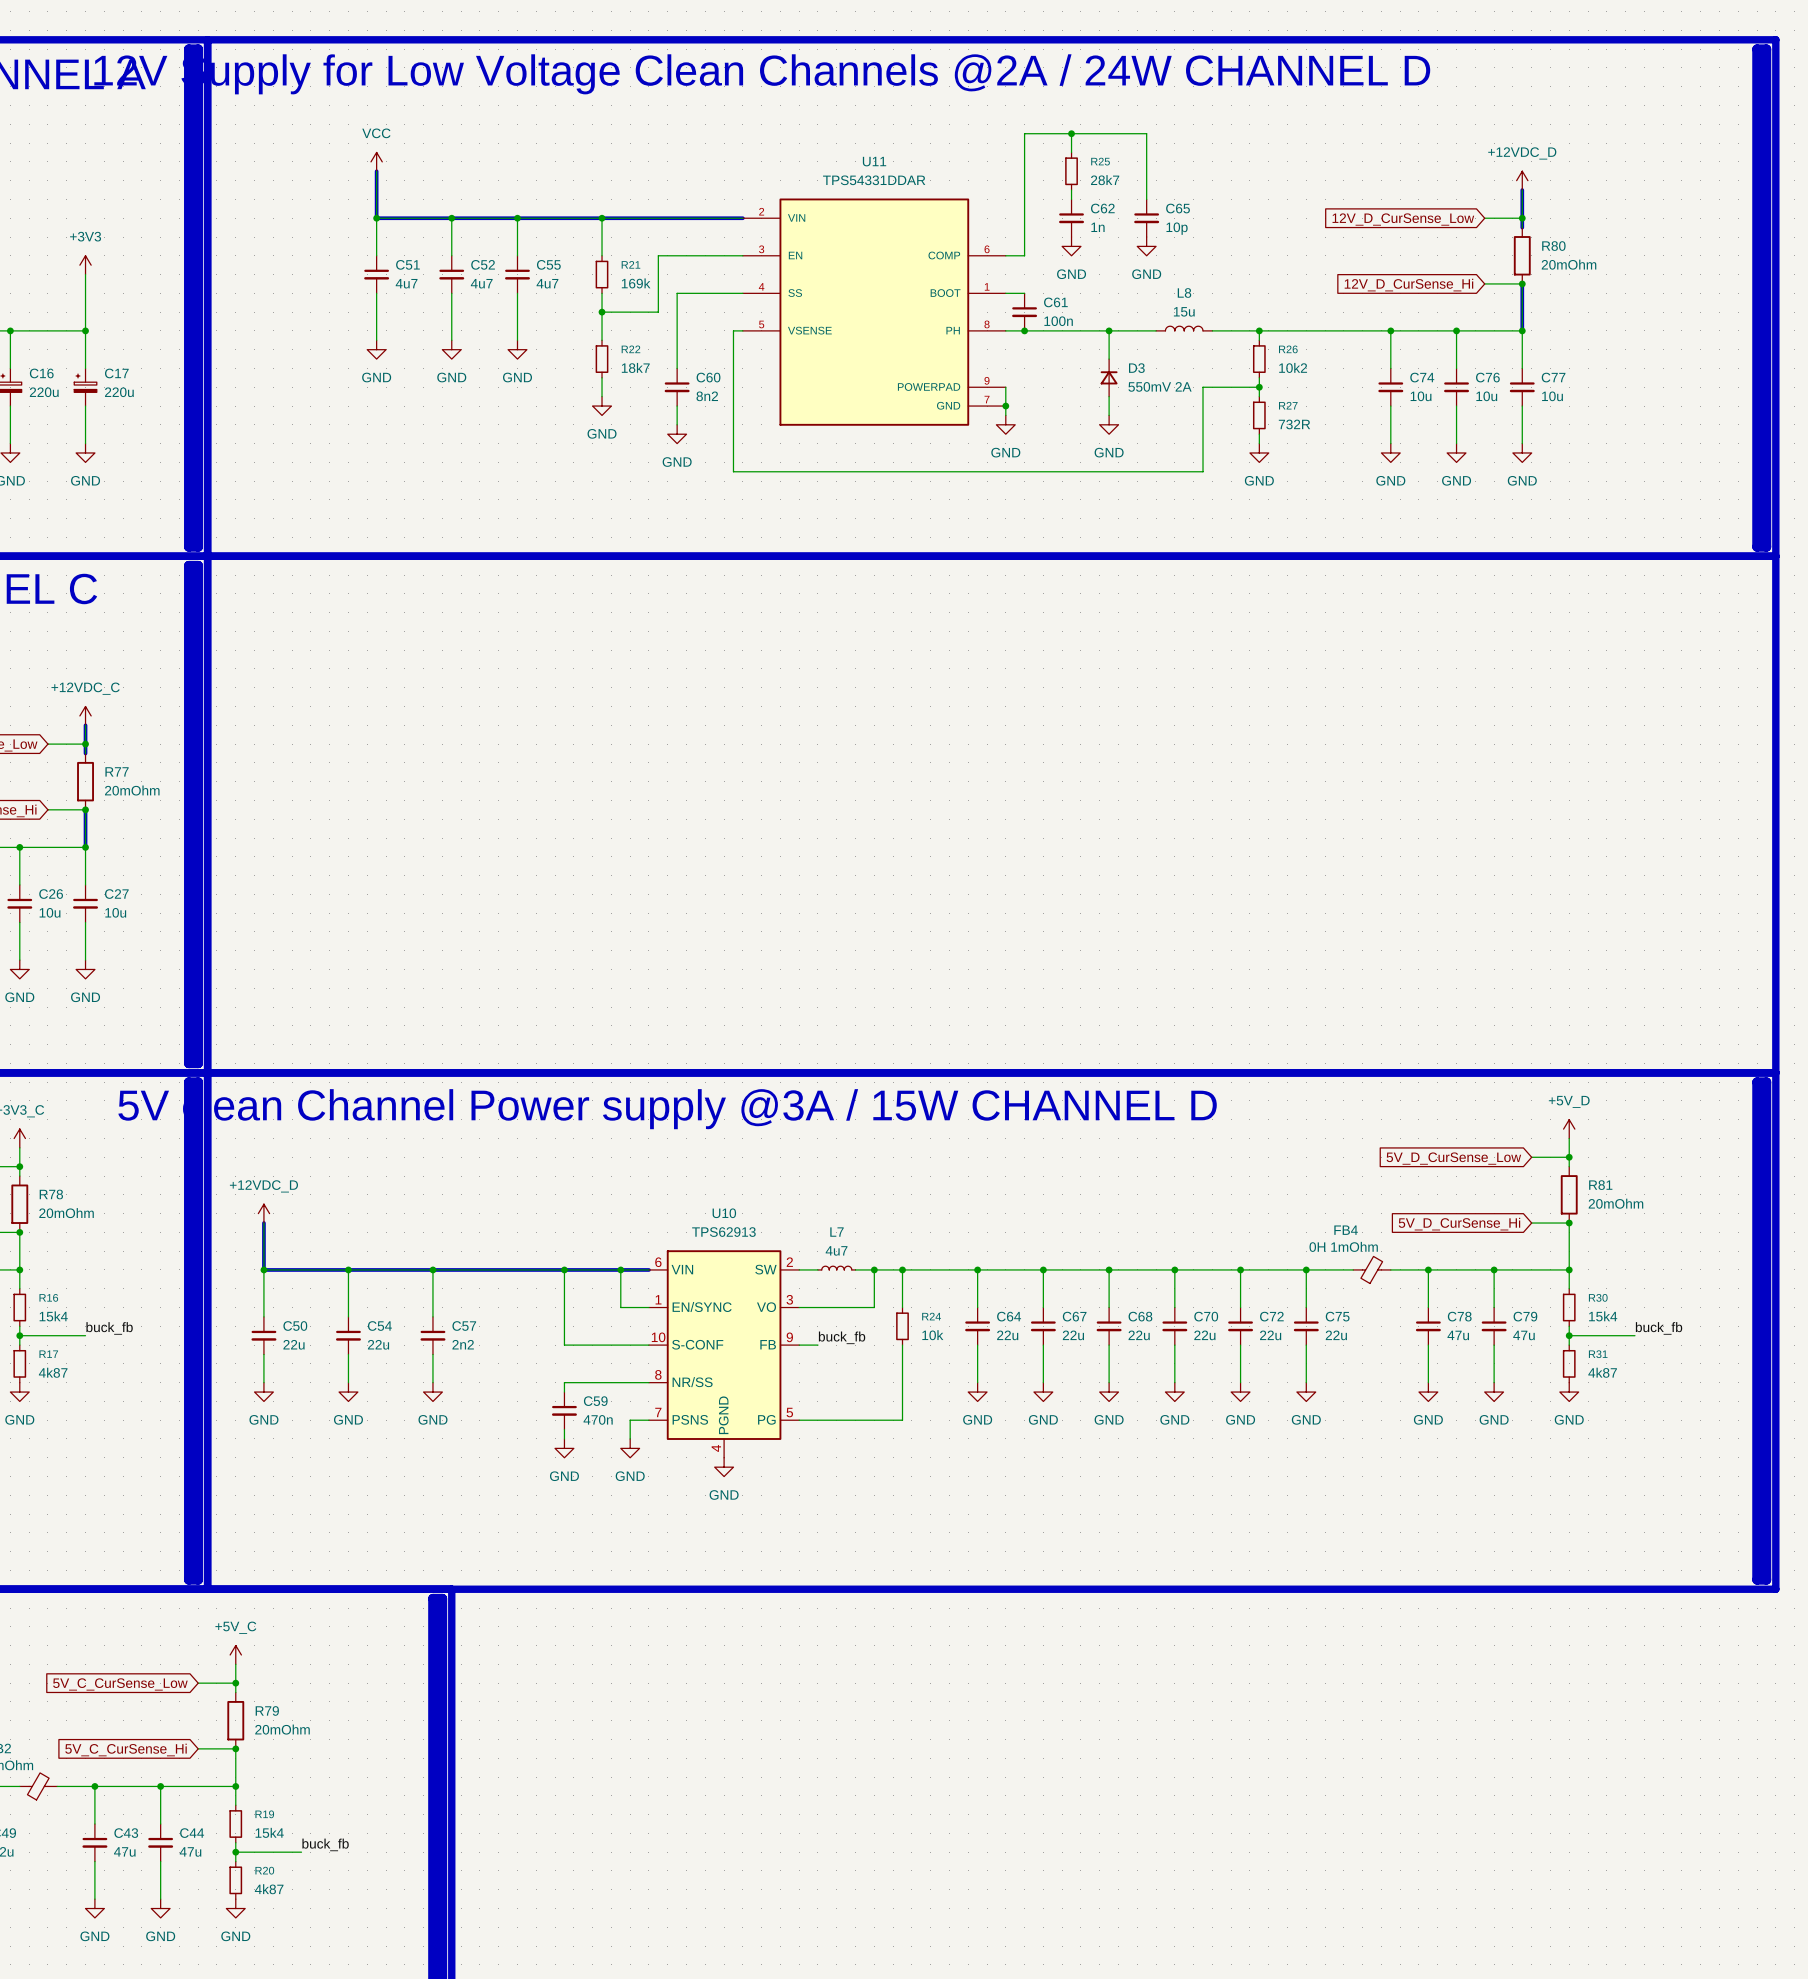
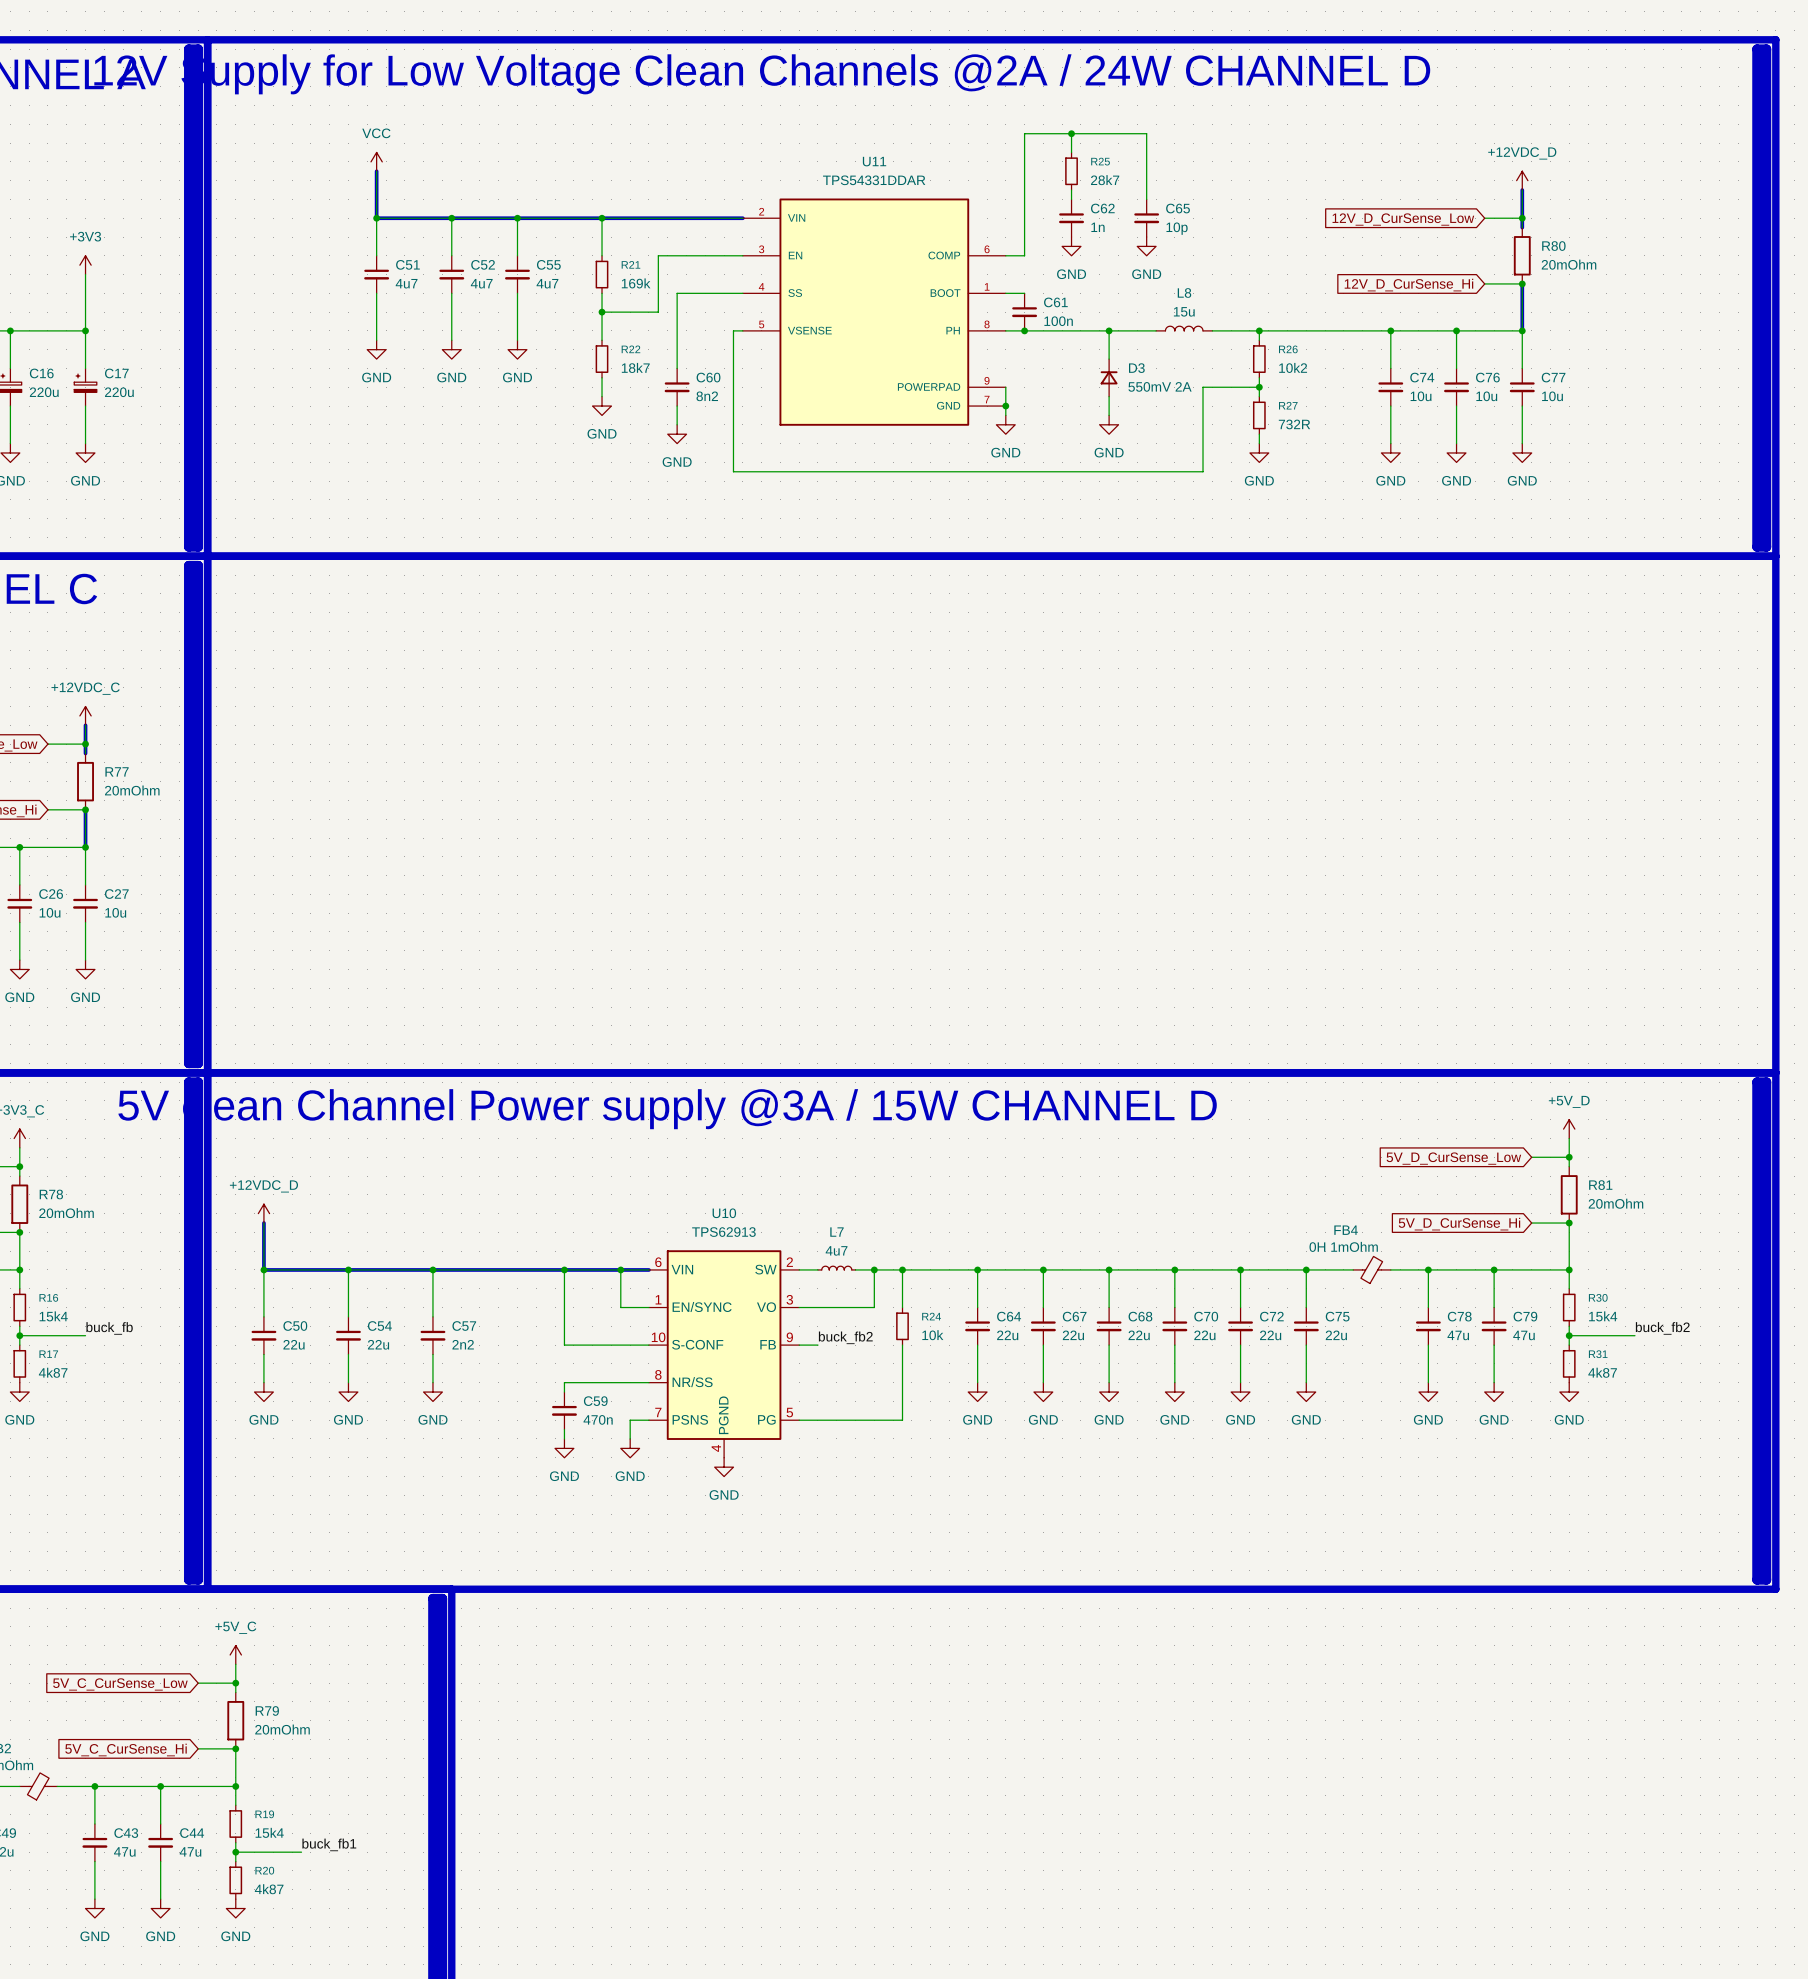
label: buck_fb (1659, 1328) -> buck_fb2 (1662, 1328)
label: buck_fb (842, 1337) -> buck_fb2 (845, 1337)
label: buck_fb (325, 1844) -> buck_fb1 (329, 1844)

